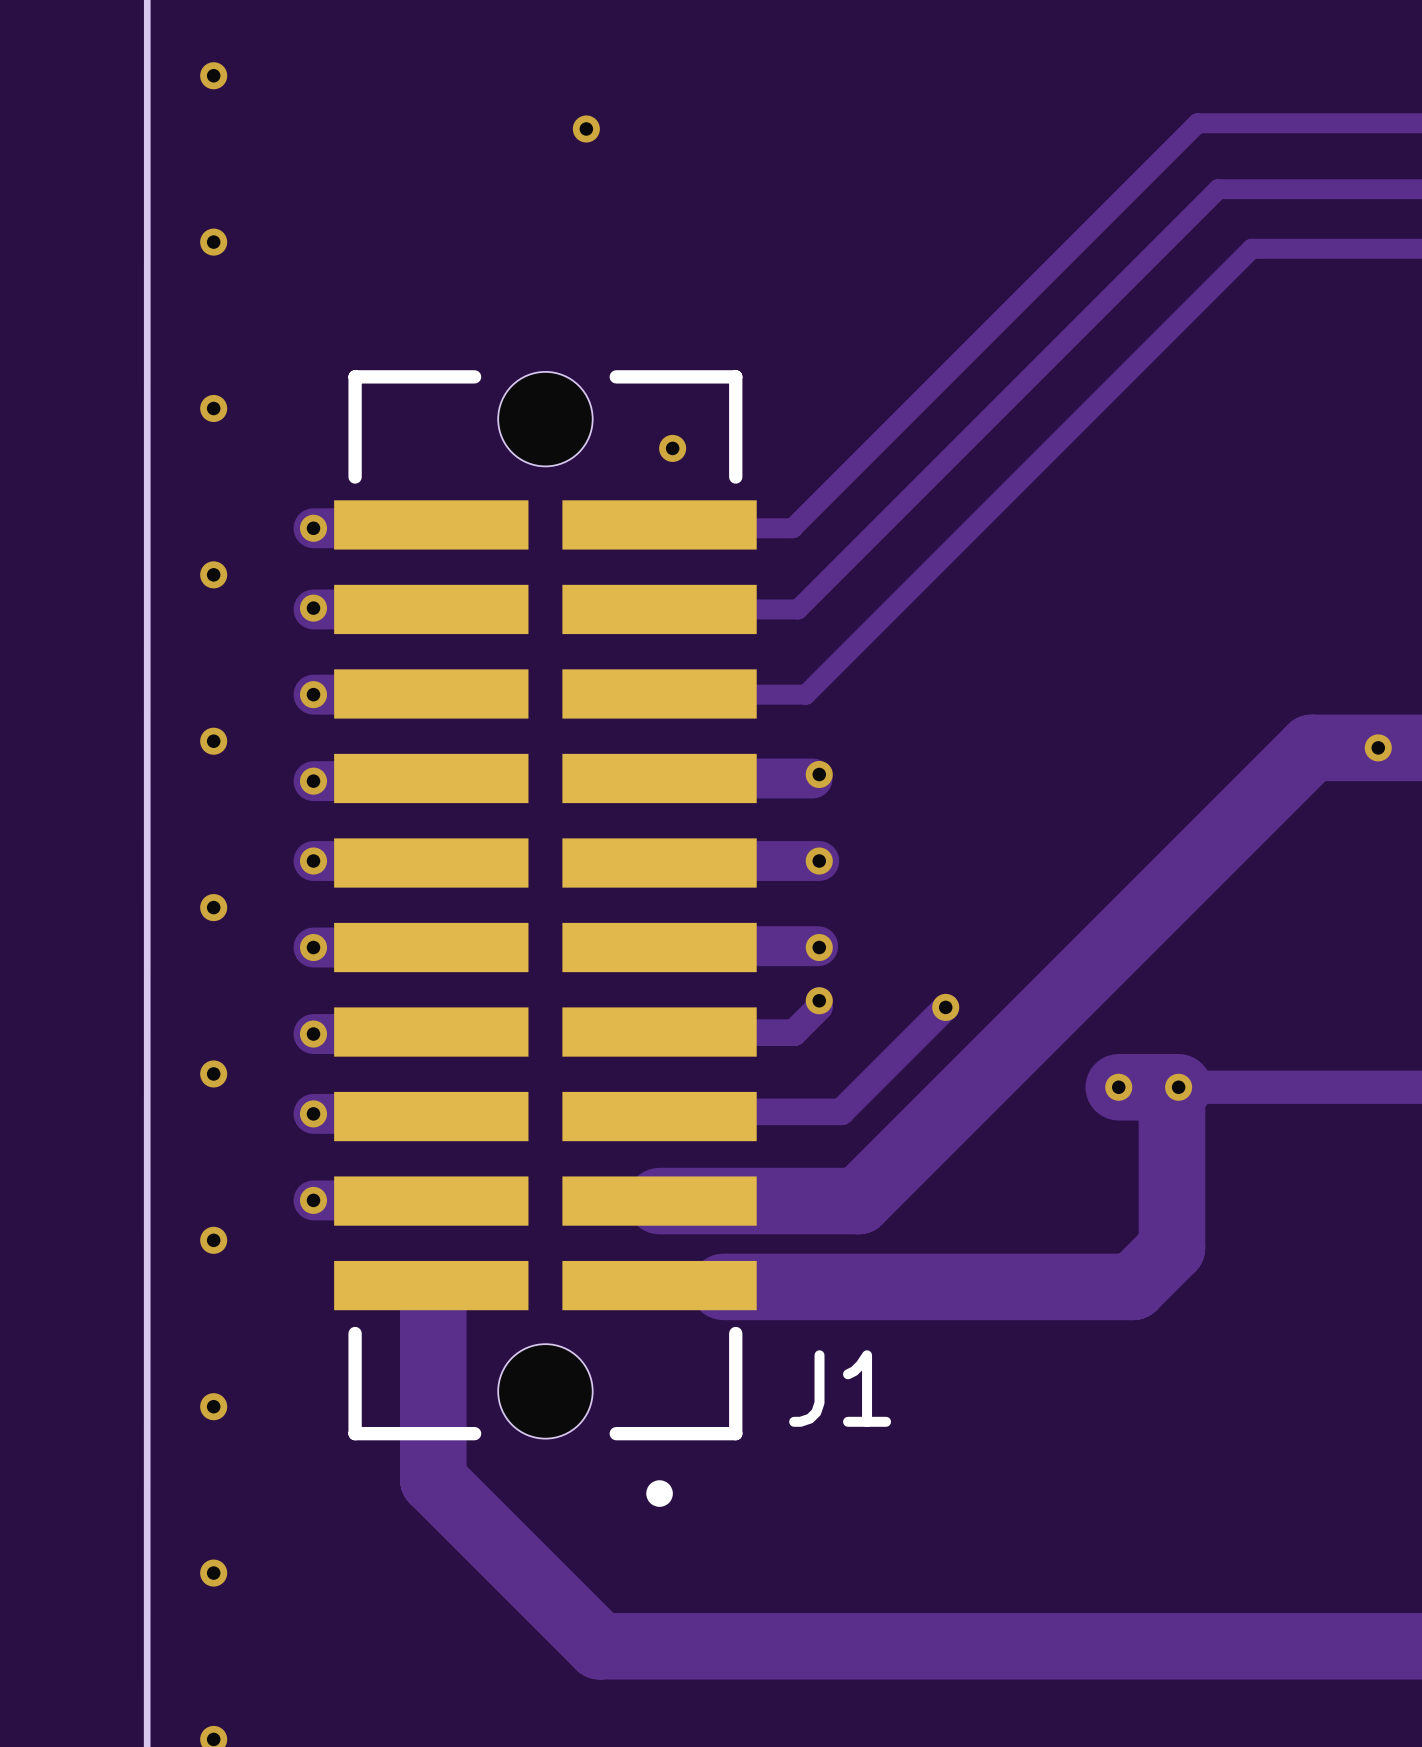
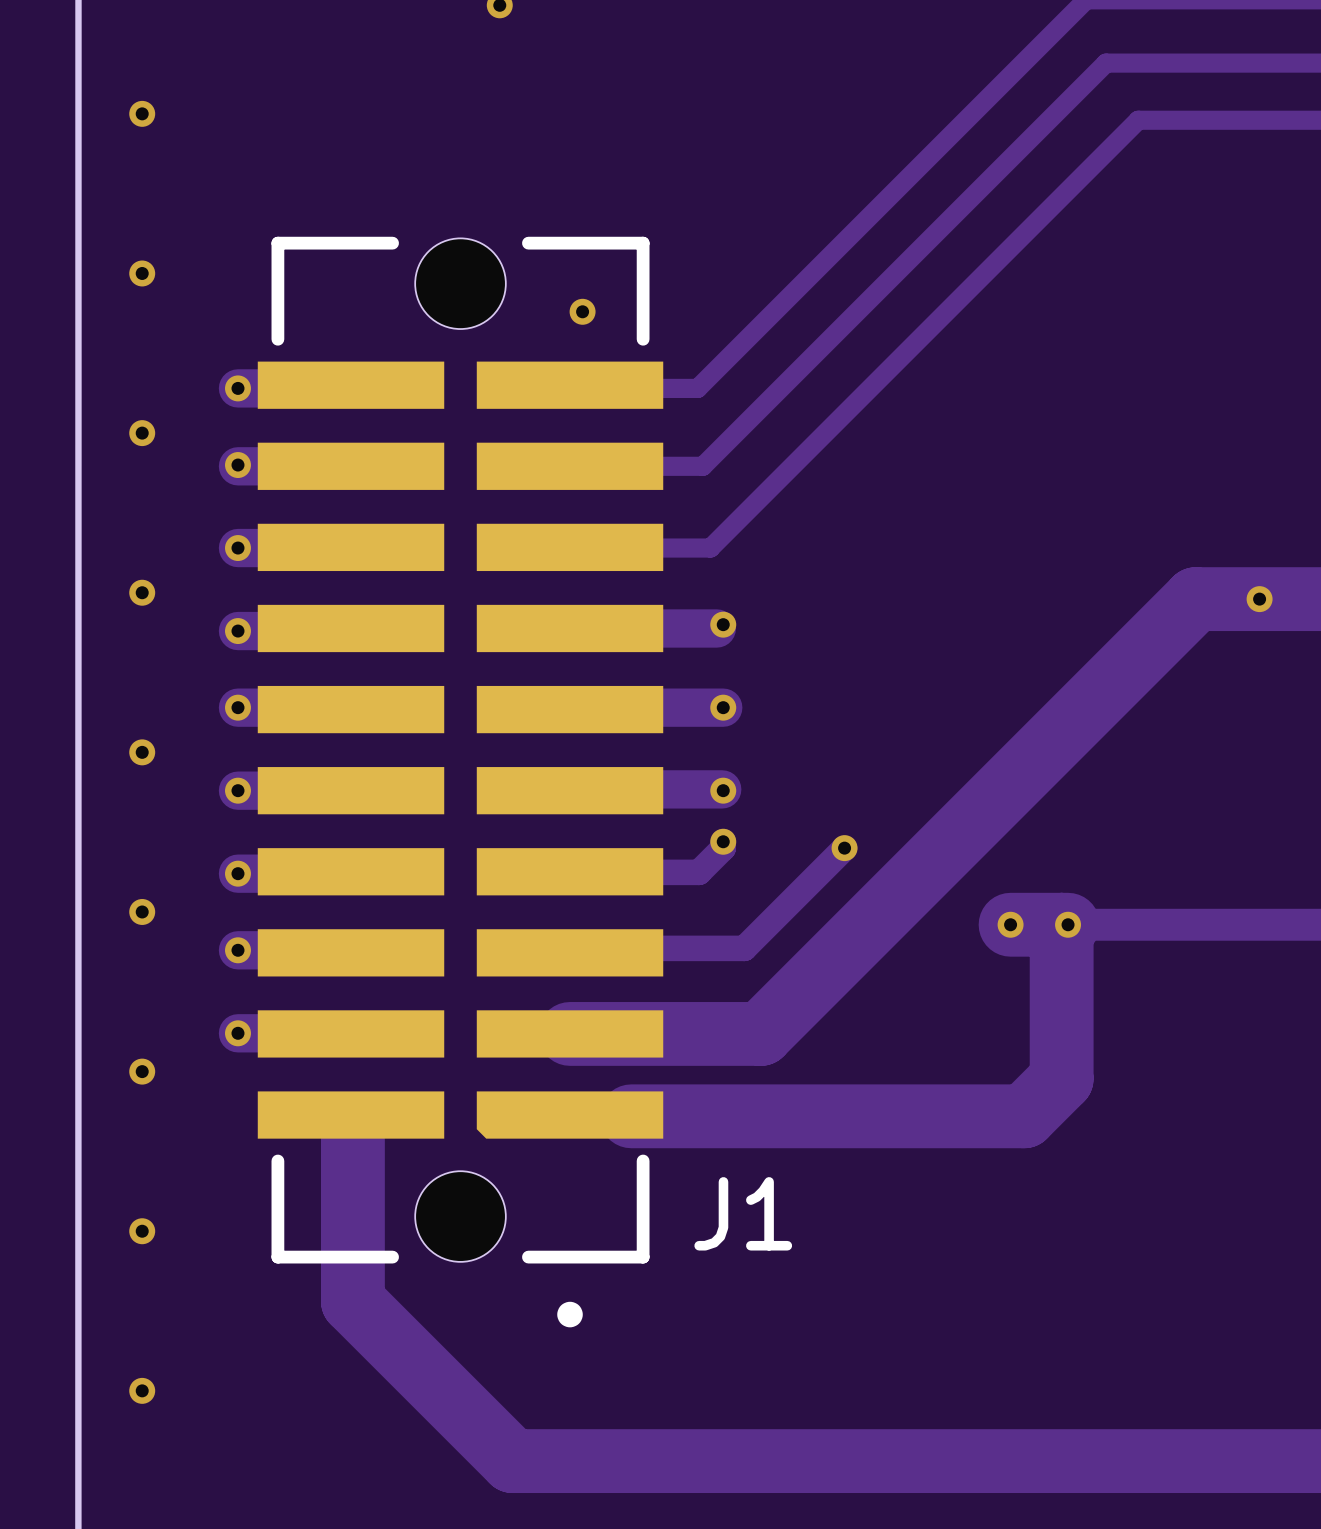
J1 footprint: [334, 370, 757, 1507] -> [257, 236, 664, 1328]

